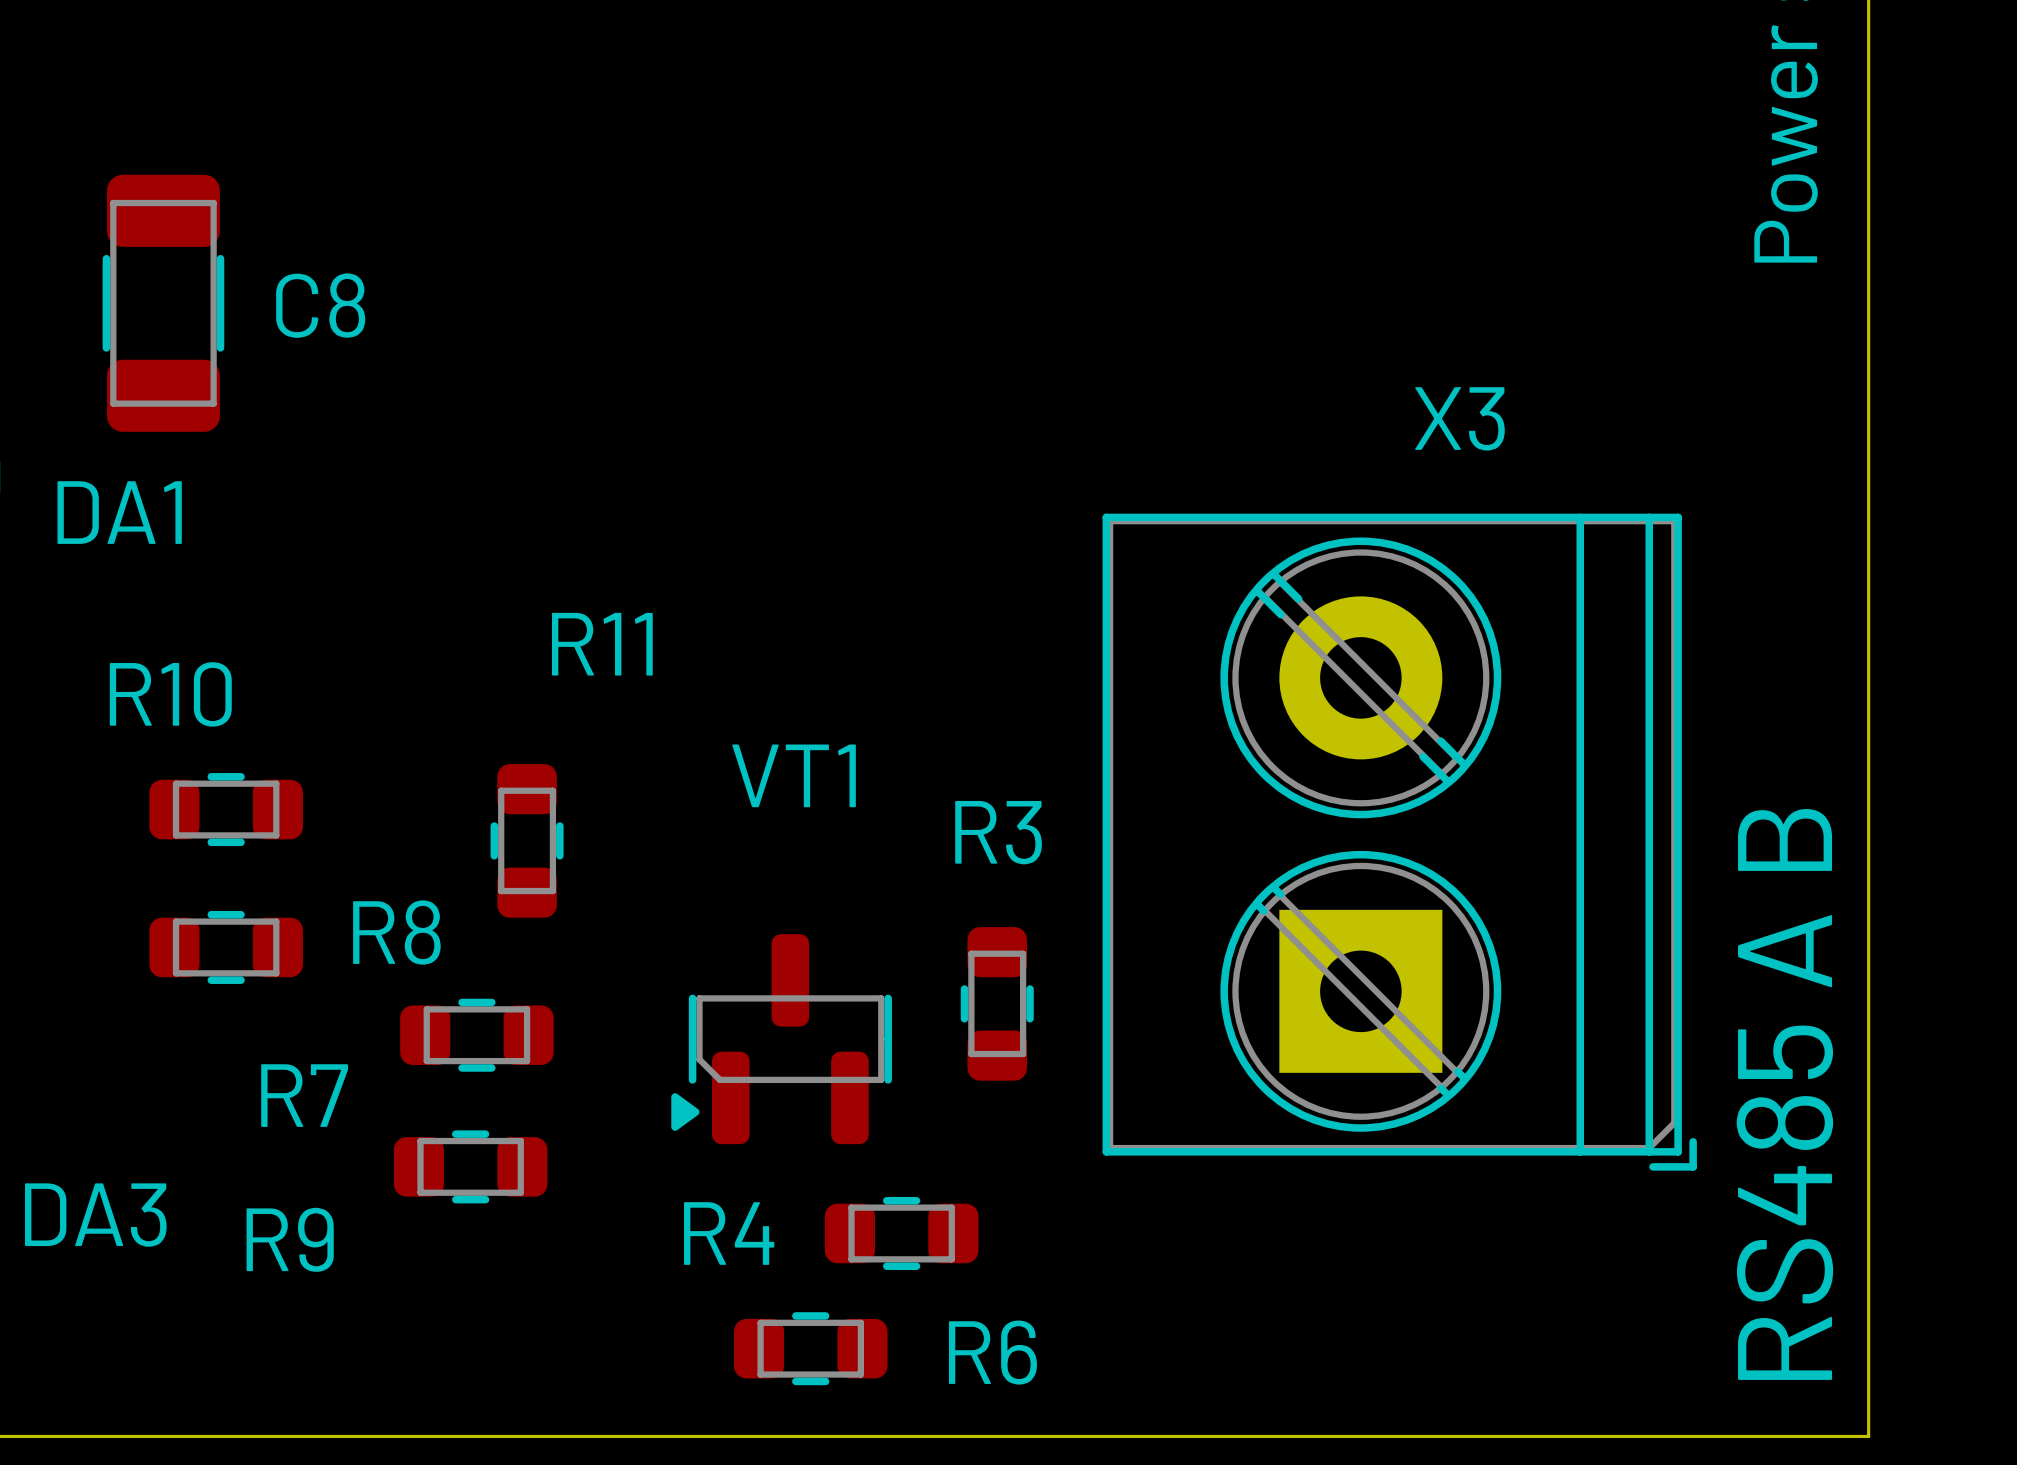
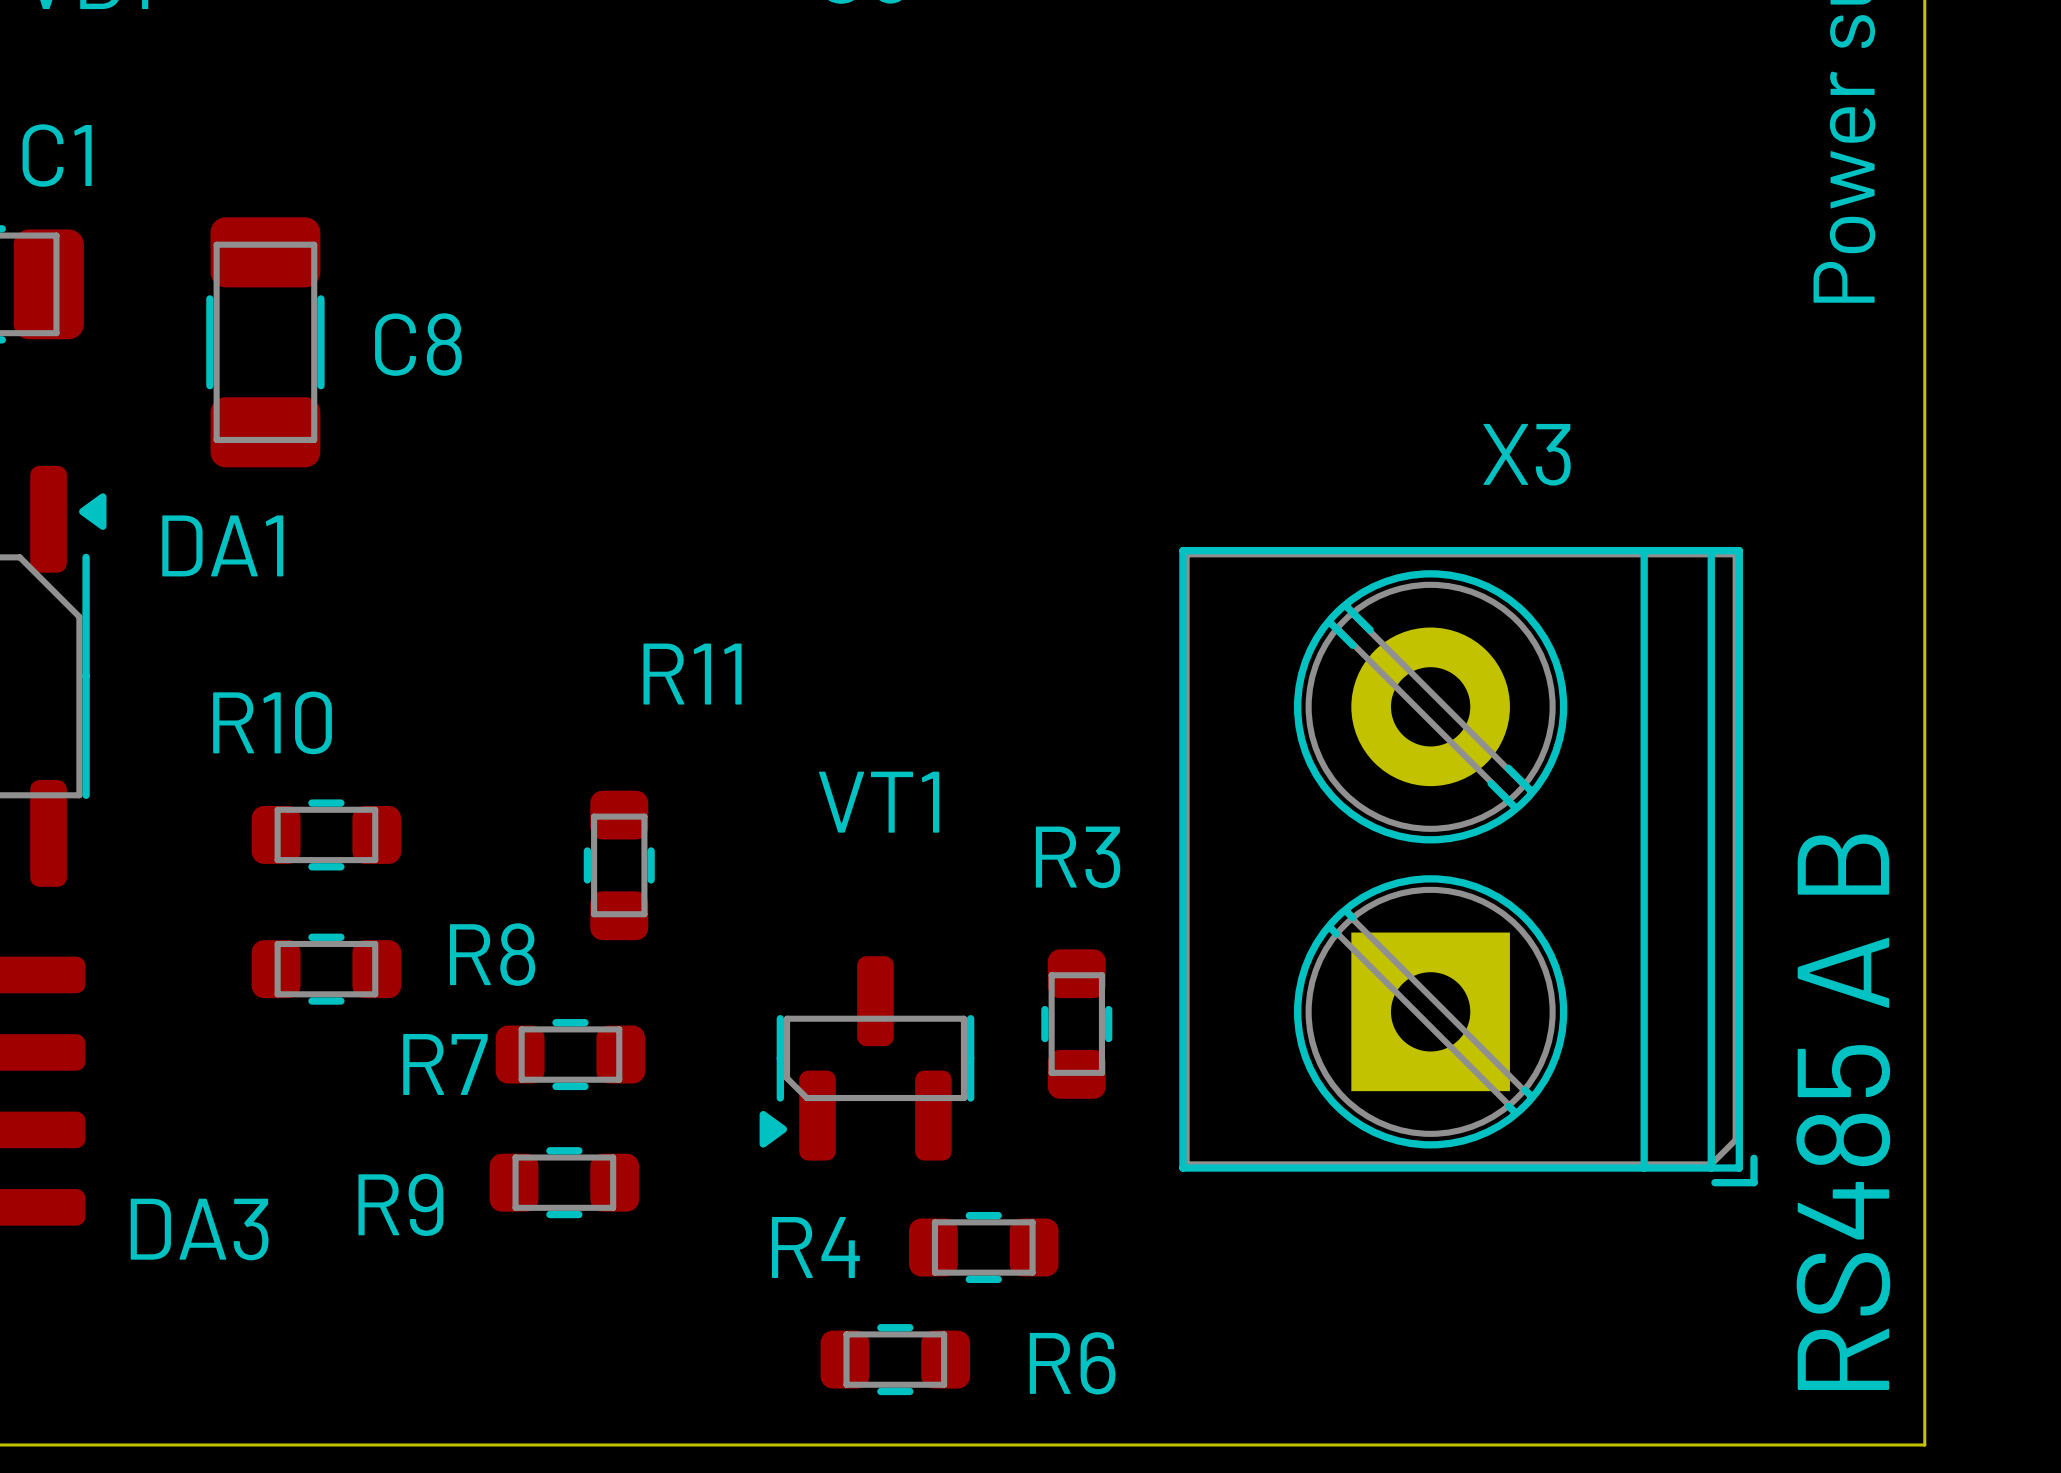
R7 name position: R7 (304, 1095) -> R7 (445, 1064)
R9 name position: R9 (290, 1239) -> R9 (400, 1204)

